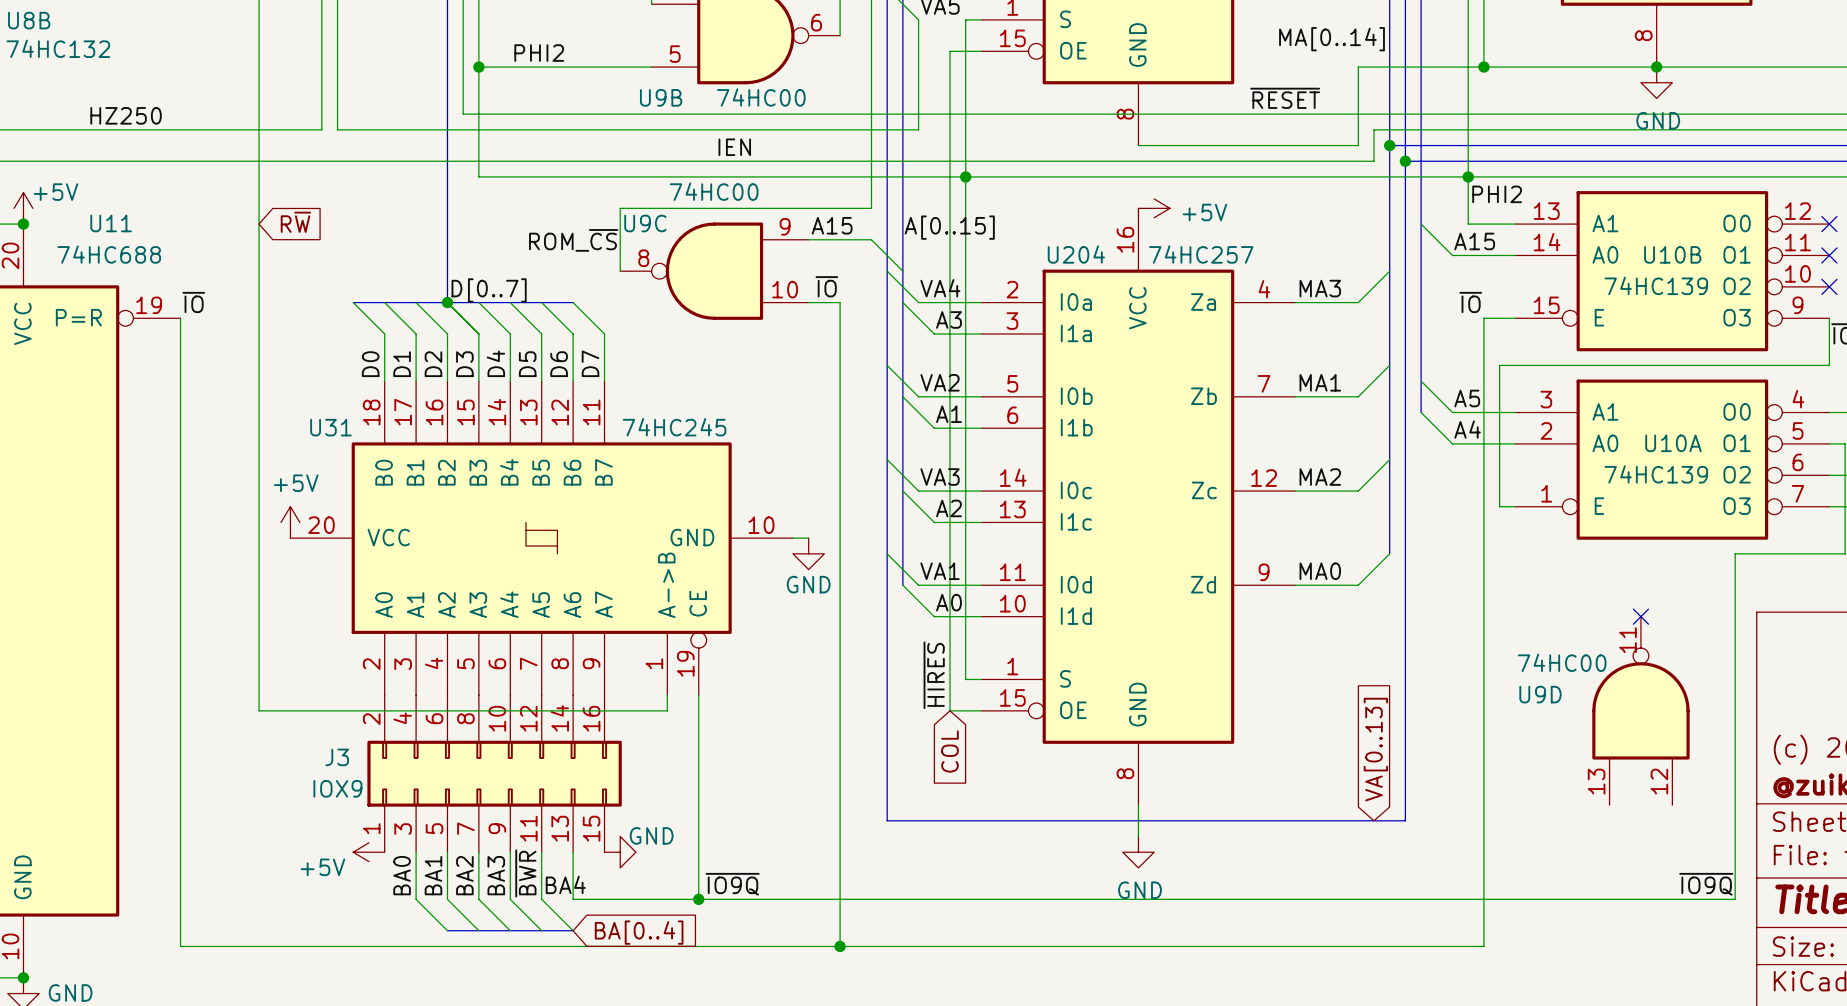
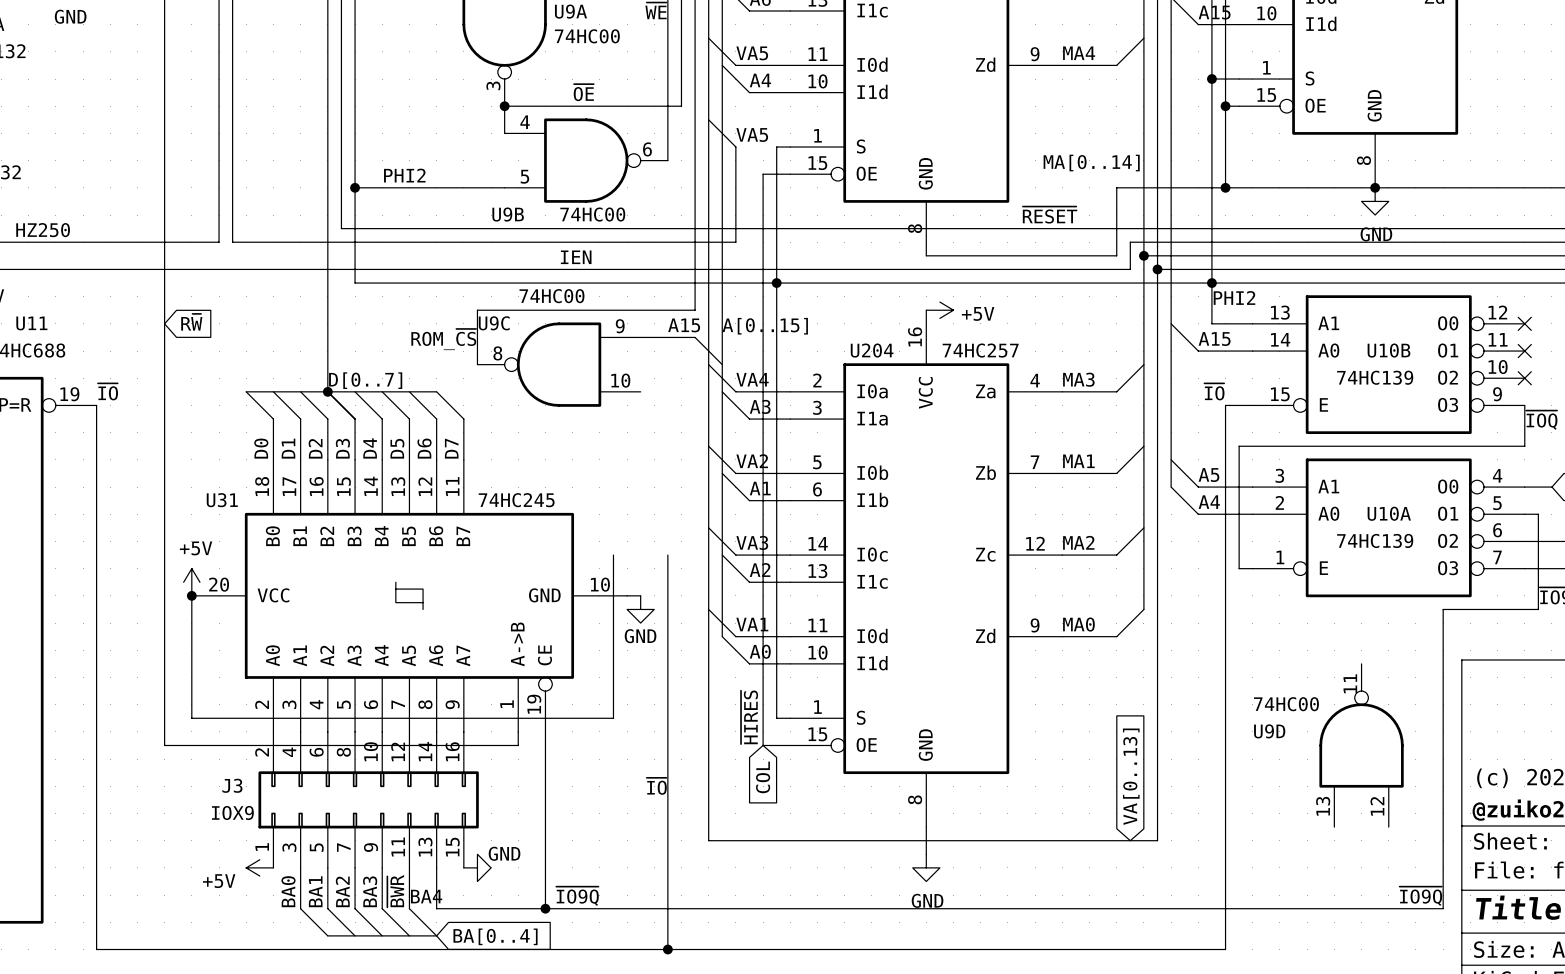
label position: A15 (832, 225) -> A15 (684, 325)
label: ~{IO} (826, 286) -> none
wire: (808, 302) (840, 302) (840, 491) -> none
wire: none -> (613, 555) (613, 718) (191, 718) (191, 595)
junction: none -> (191, 595)
no-connect mark: (1640, 616) -> none
label: none -> ~{IO} (656, 786)

